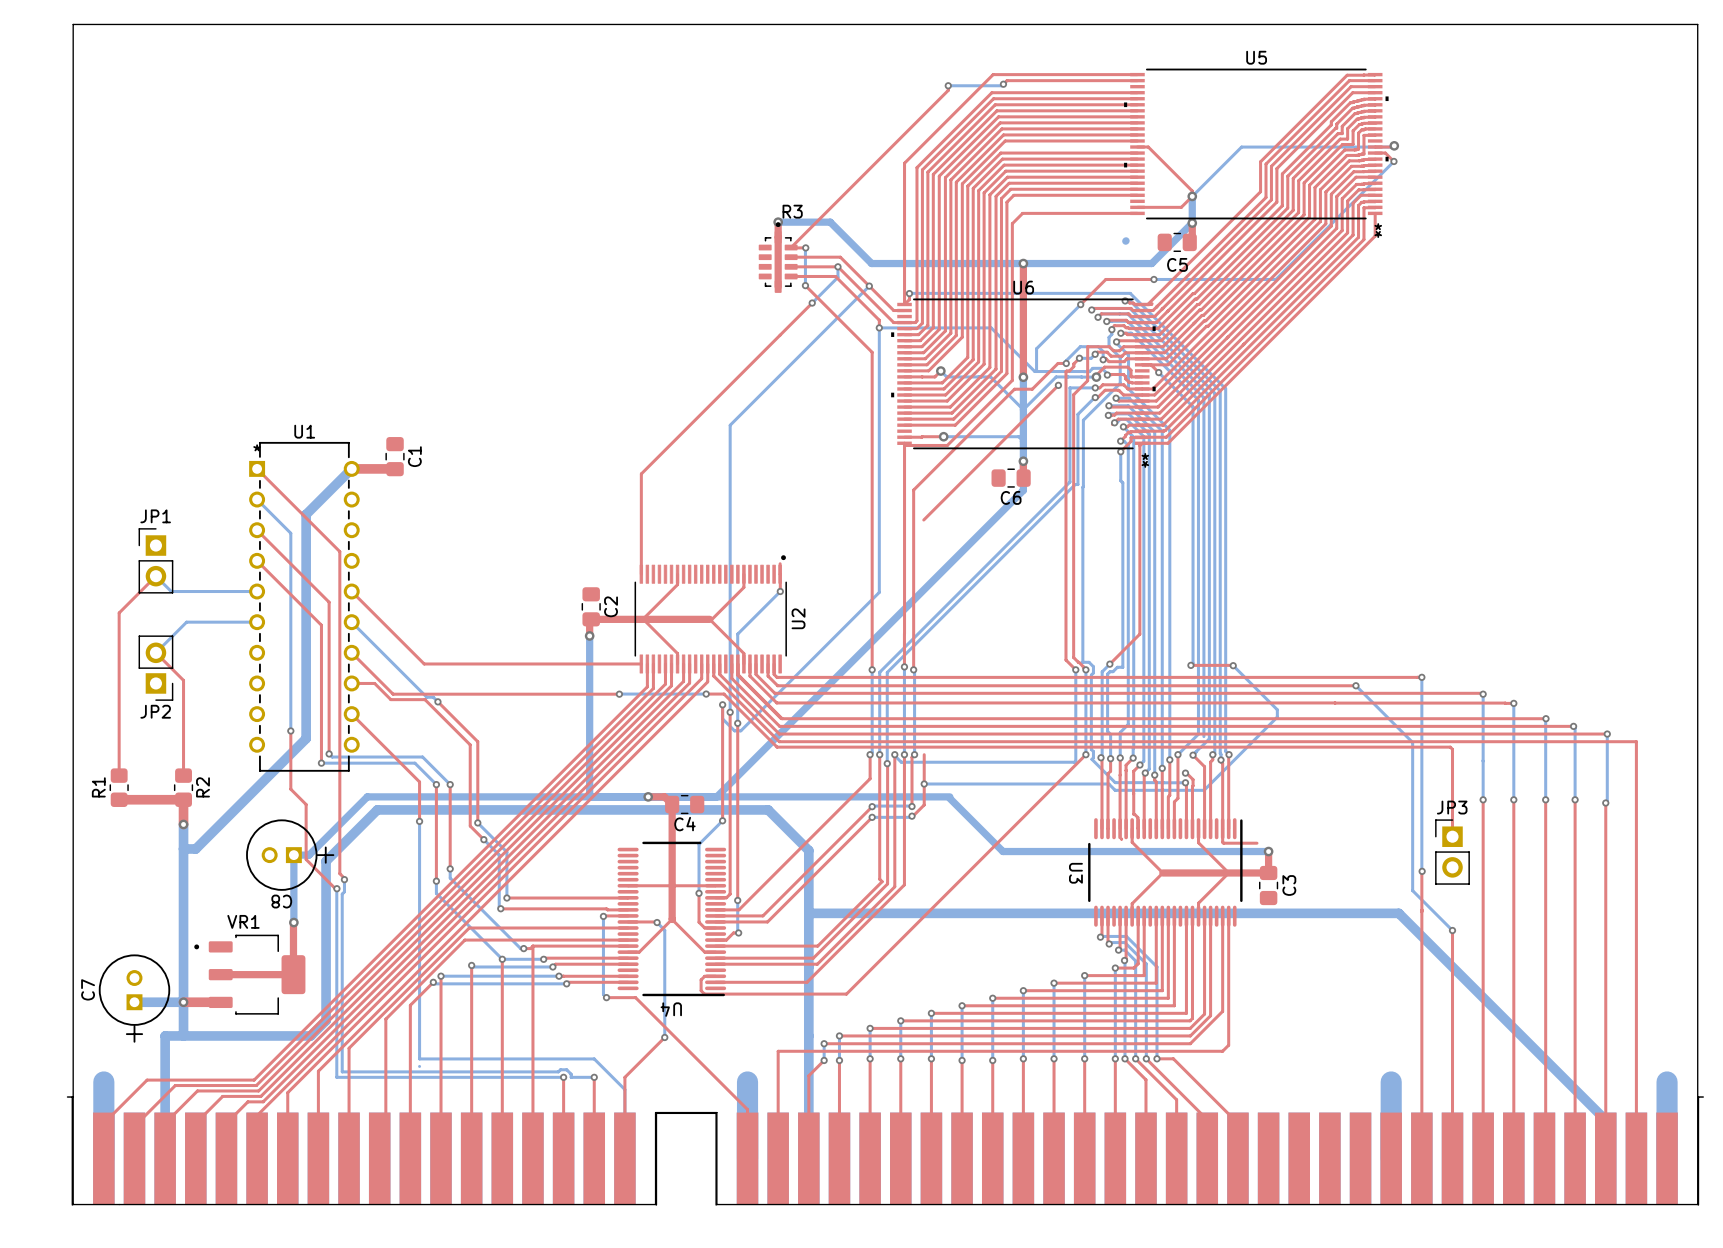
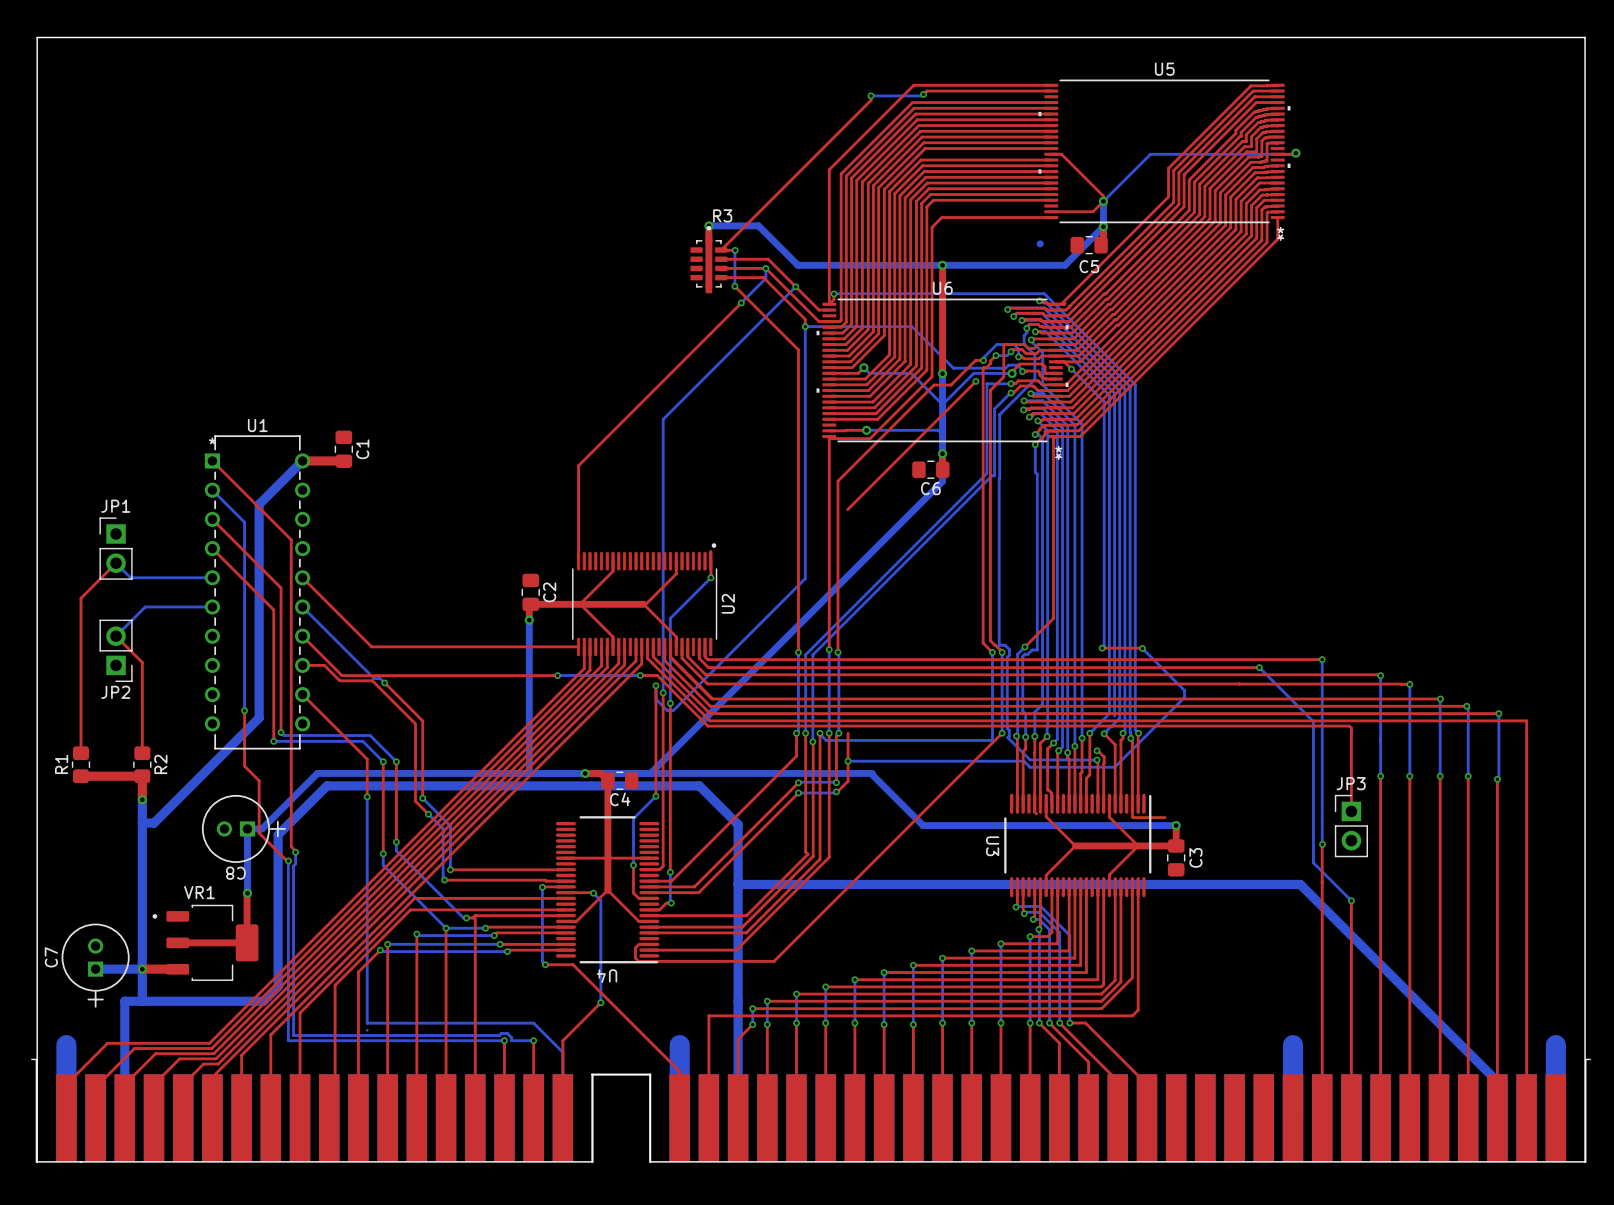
top track: (1375, 153) (1385, 153) (1393, 161) -> none
bottom track: (1393, 161) (1275, 279) (1153, 279) -> none
via: (1393, 161) -> none
top track: (1153, 279) (1105, 279) (1080, 304) -> none
via: (1153, 279) -> none
bottom track: (1080, 304) (1036, 348) (1036, 371) -> none
via: (1080, 304) -> none

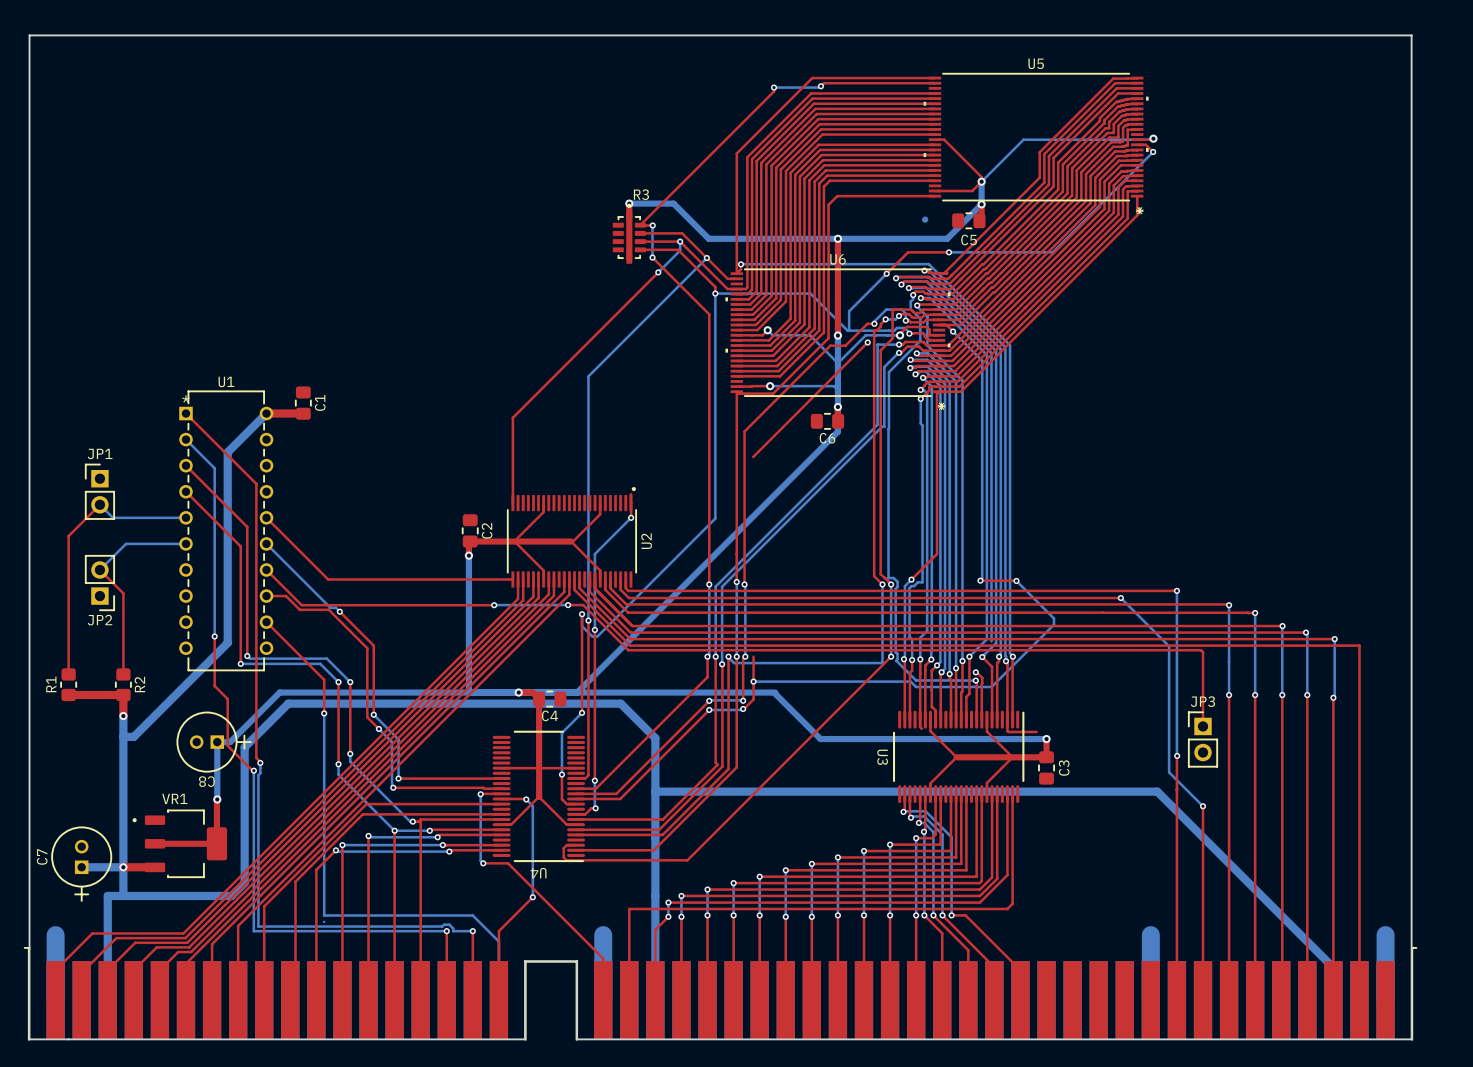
top track: none -> (1137, 144) (1145, 144) (1153, 151)
bottom track: none -> (1153, 151) (1052, 252) (949, 252)
via: none -> (1153, 151)
top track: none -> (949, 252) (908, 252) (886, 273)
via: none -> (949, 252)
bottom track: none -> (886, 273) (849, 311) (849, 330)
via: none -> (886, 273)

